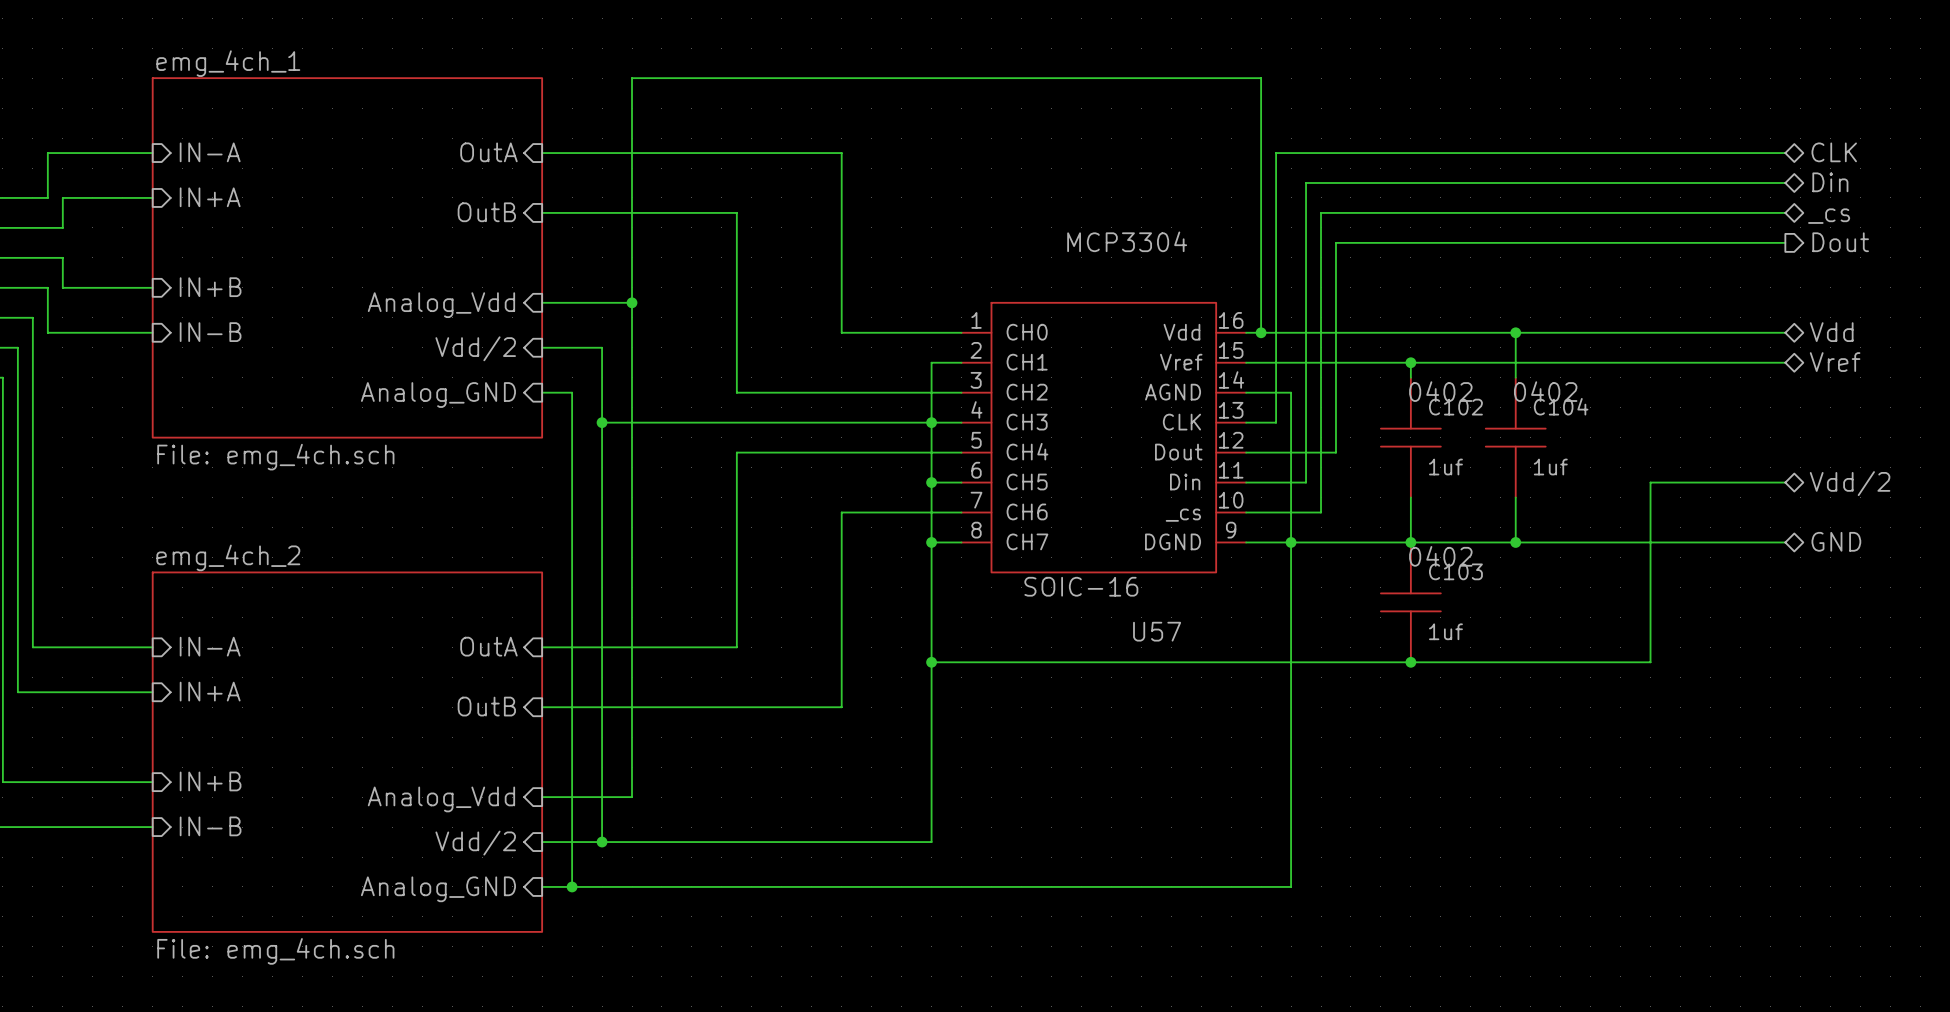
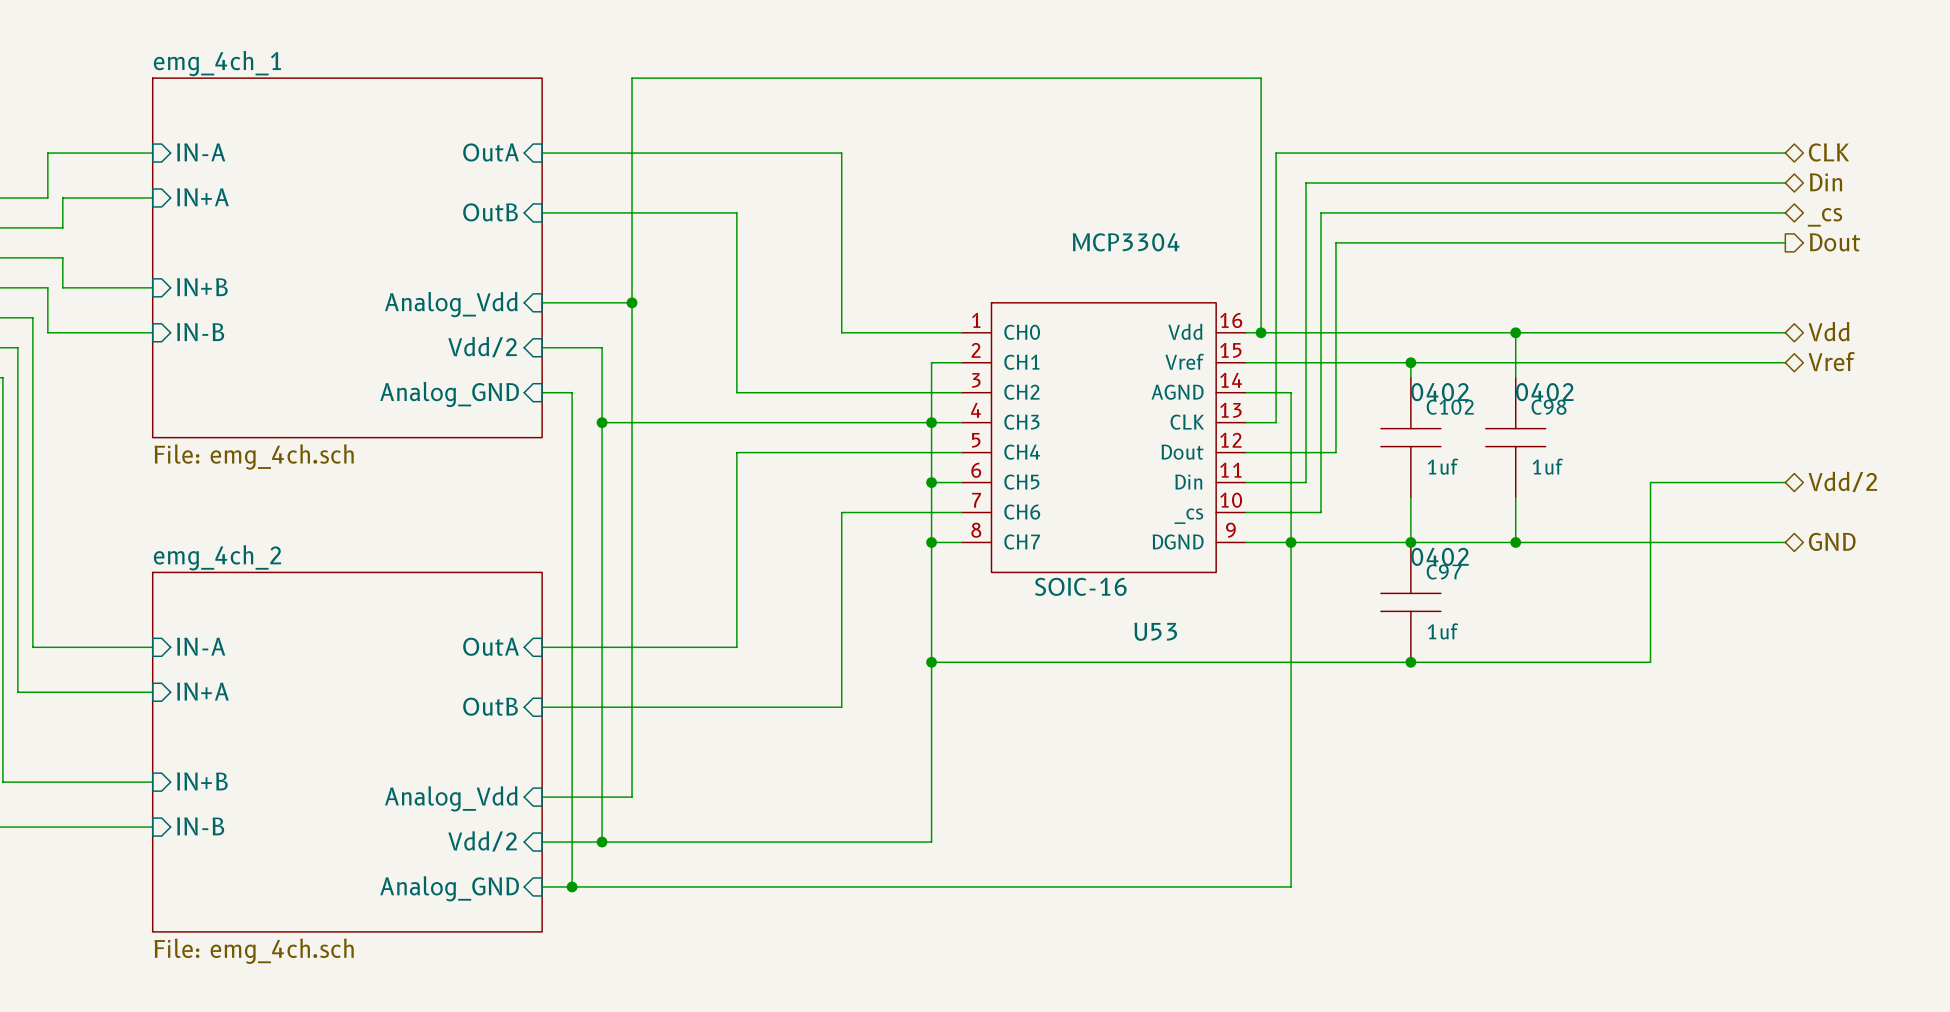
C104 name: C104 (1561, 406) -> C98 (1549, 407)
C103 name: C103 (1455, 571) -> C97 (1444, 571)
U57 name: U57 (1157, 631) -> U53 (1155, 631)

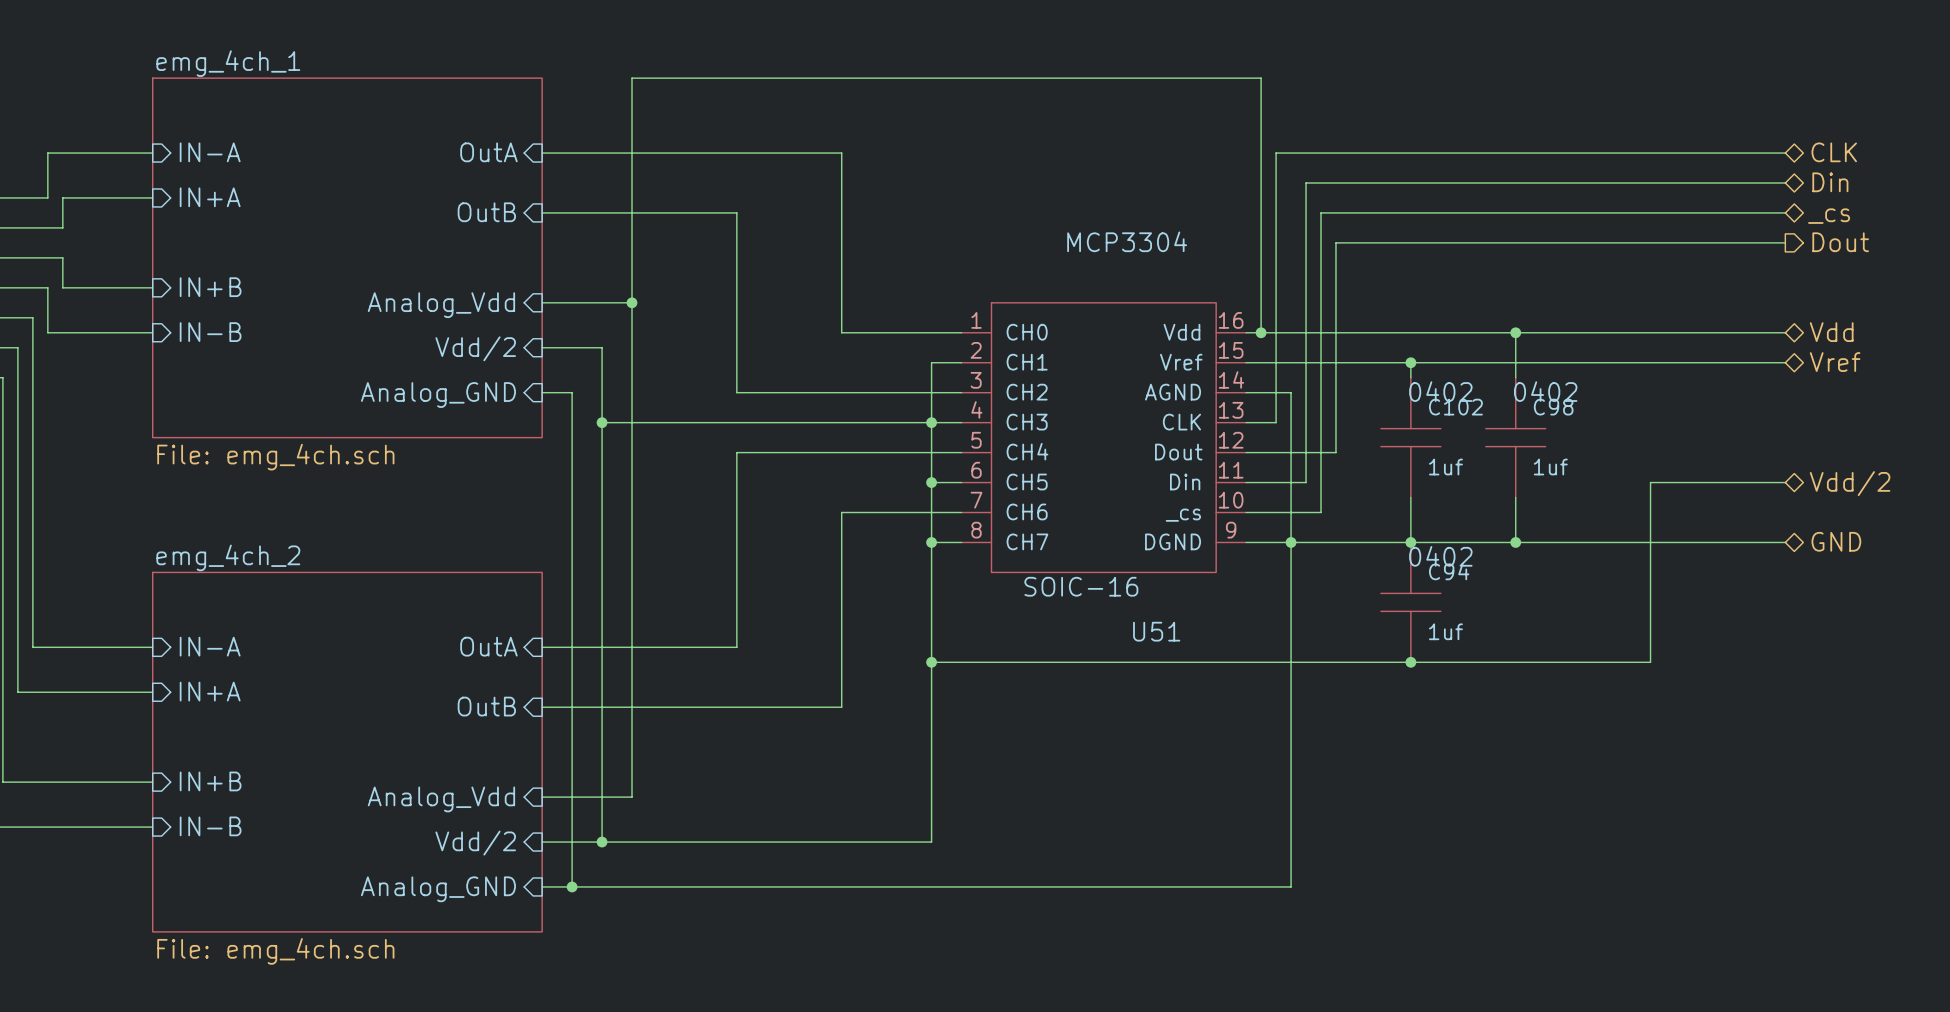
C97 name: C97 (1444, 571) -> C94 (1449, 571)
U53 name: U53 (1155, 631) -> U51 (1156, 631)

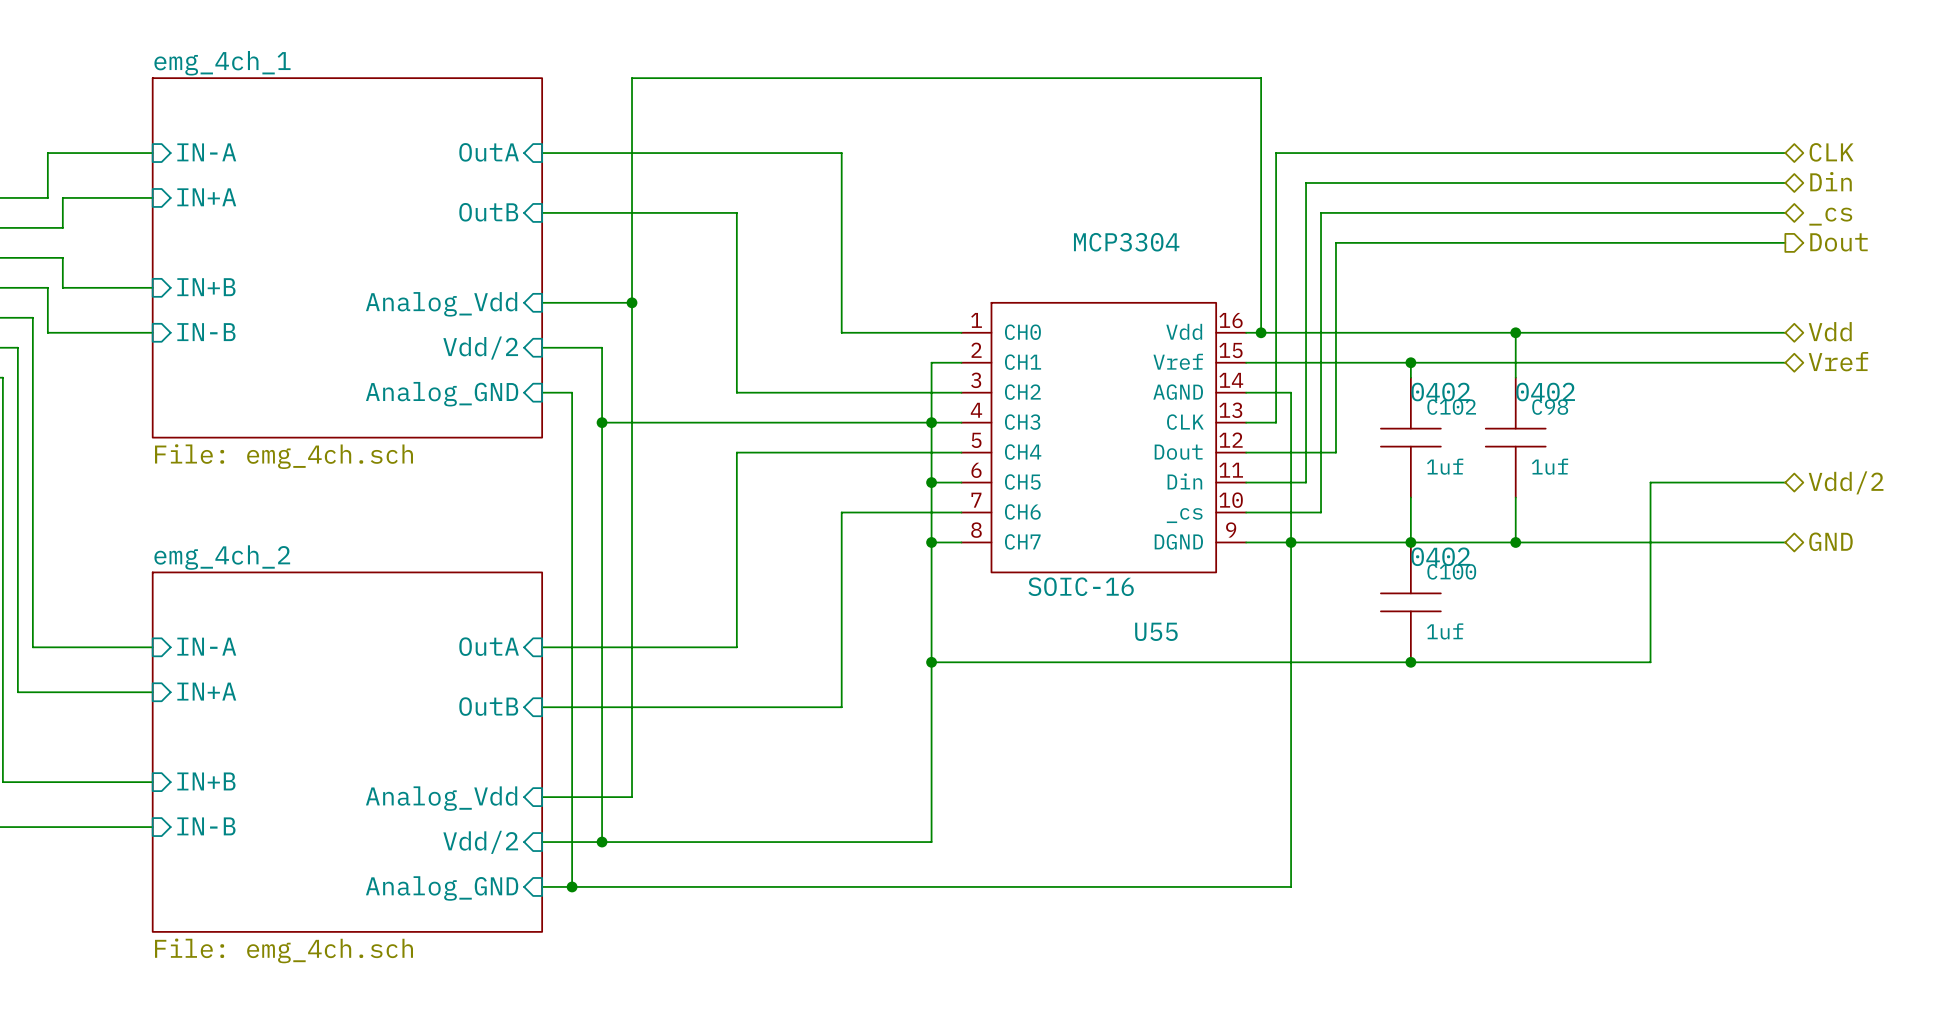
C94 name: C94 (1449, 571) -> C100 (1451, 571)
U51 name: U51 (1156, 631) -> U55 (1156, 631)

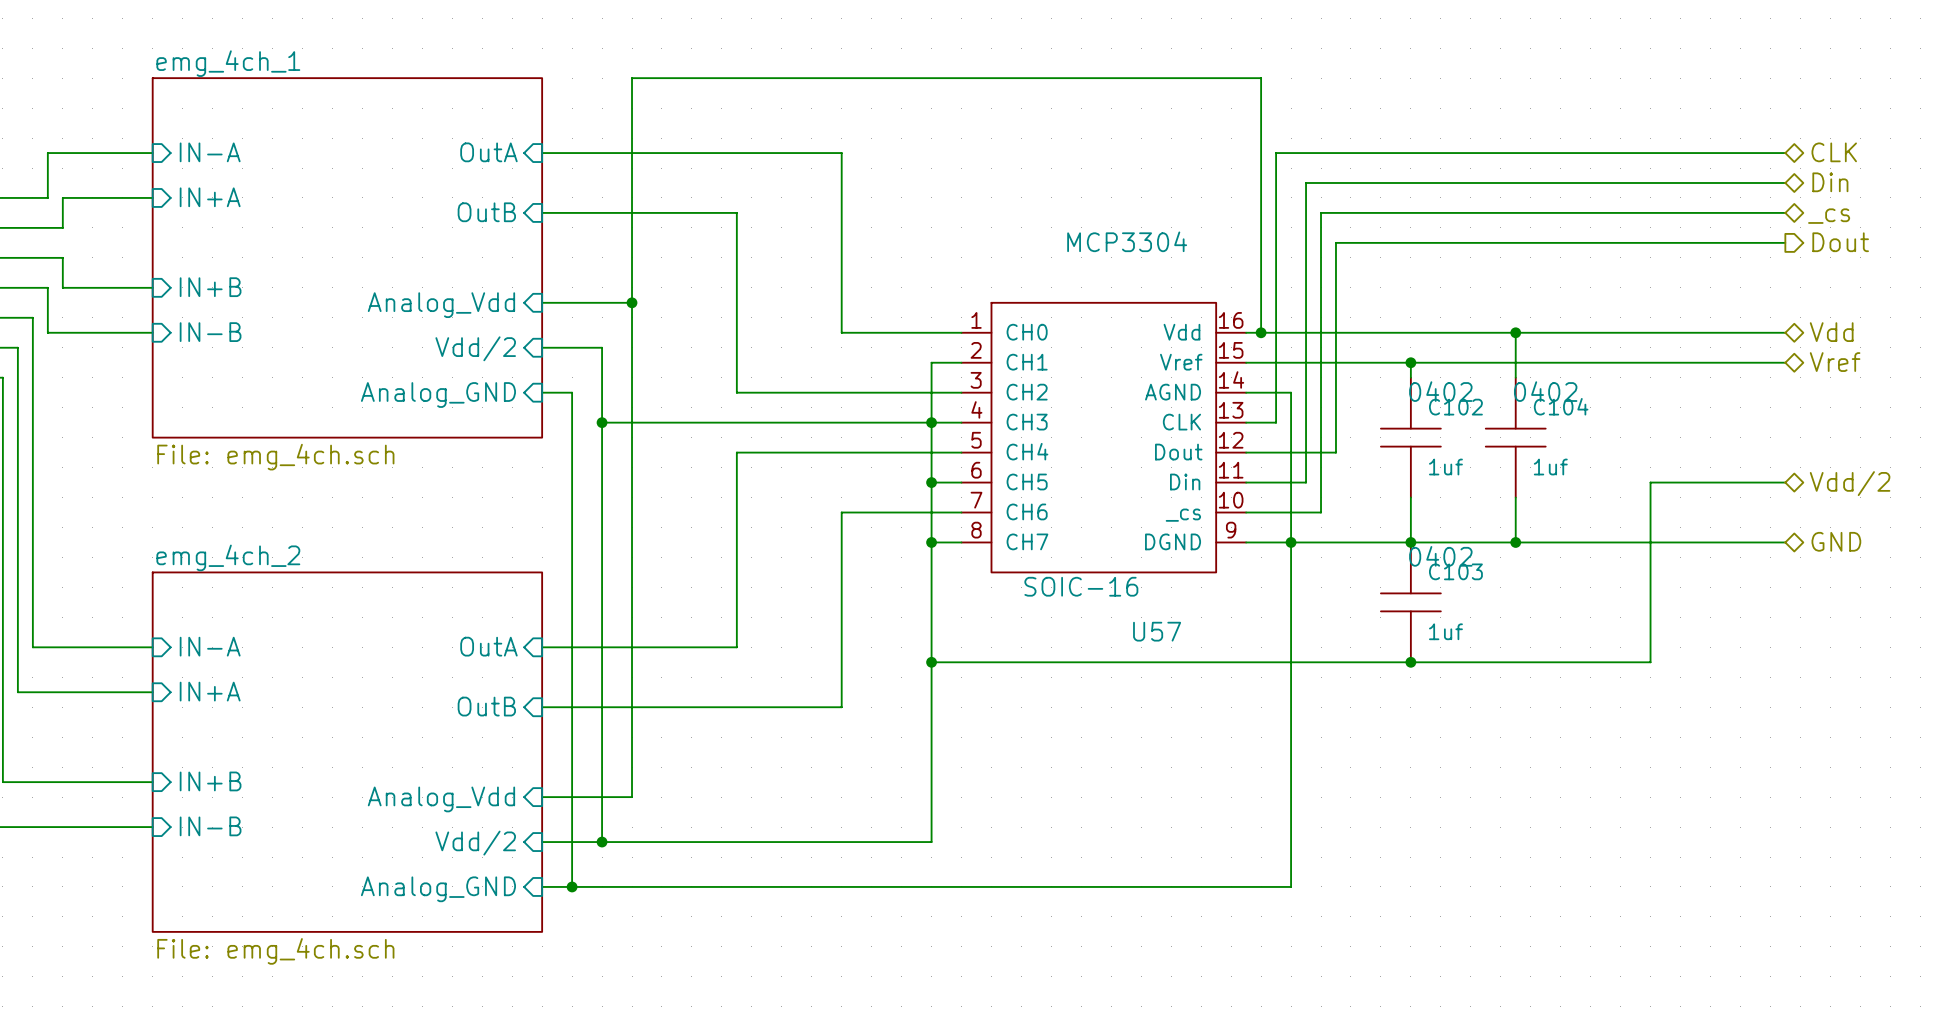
C98 name: C98 (1550, 407) -> C104 (1561, 406)
C100 name: C100 (1451, 571) -> C103 (1455, 571)
U55 name: U55 (1156, 631) -> U57 (1157, 631)

